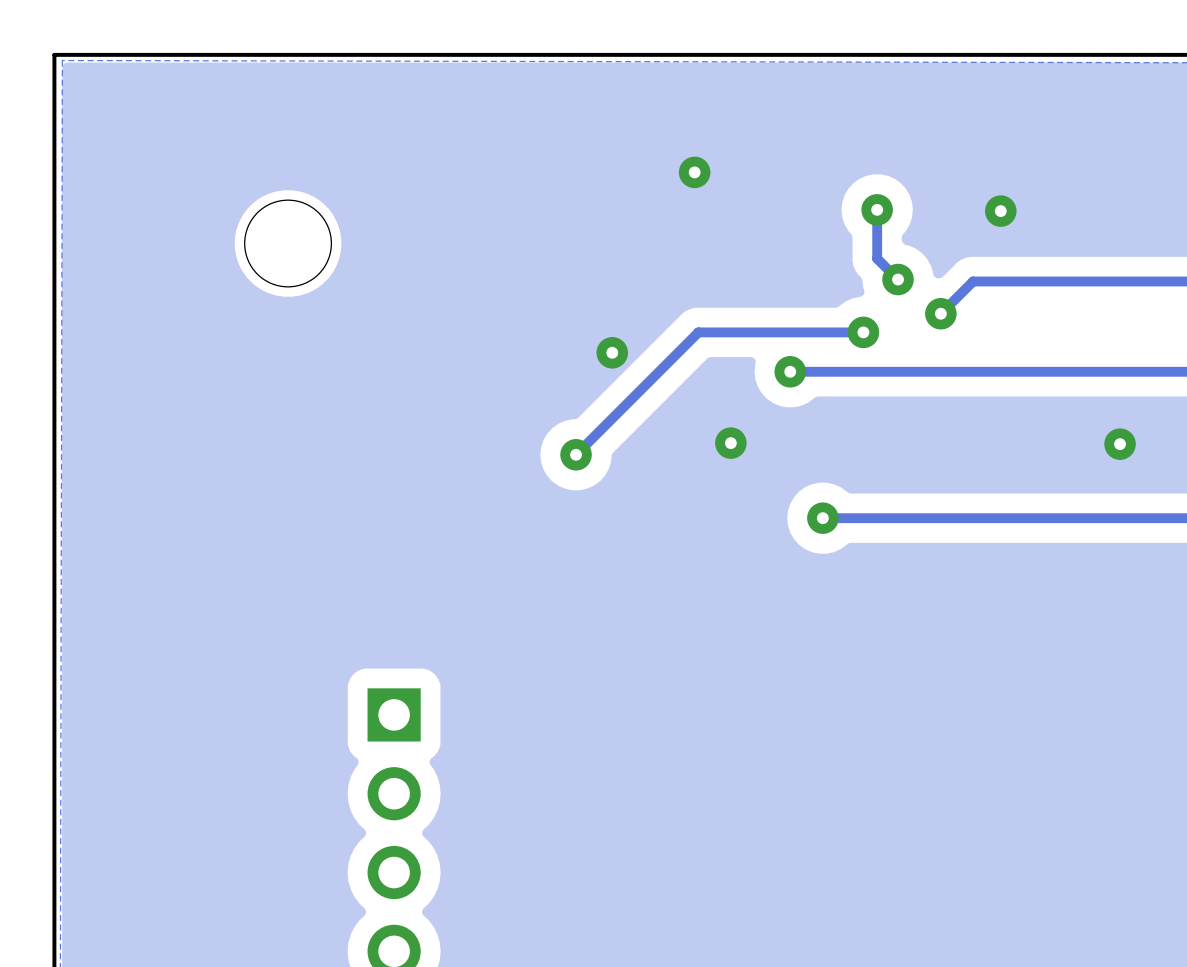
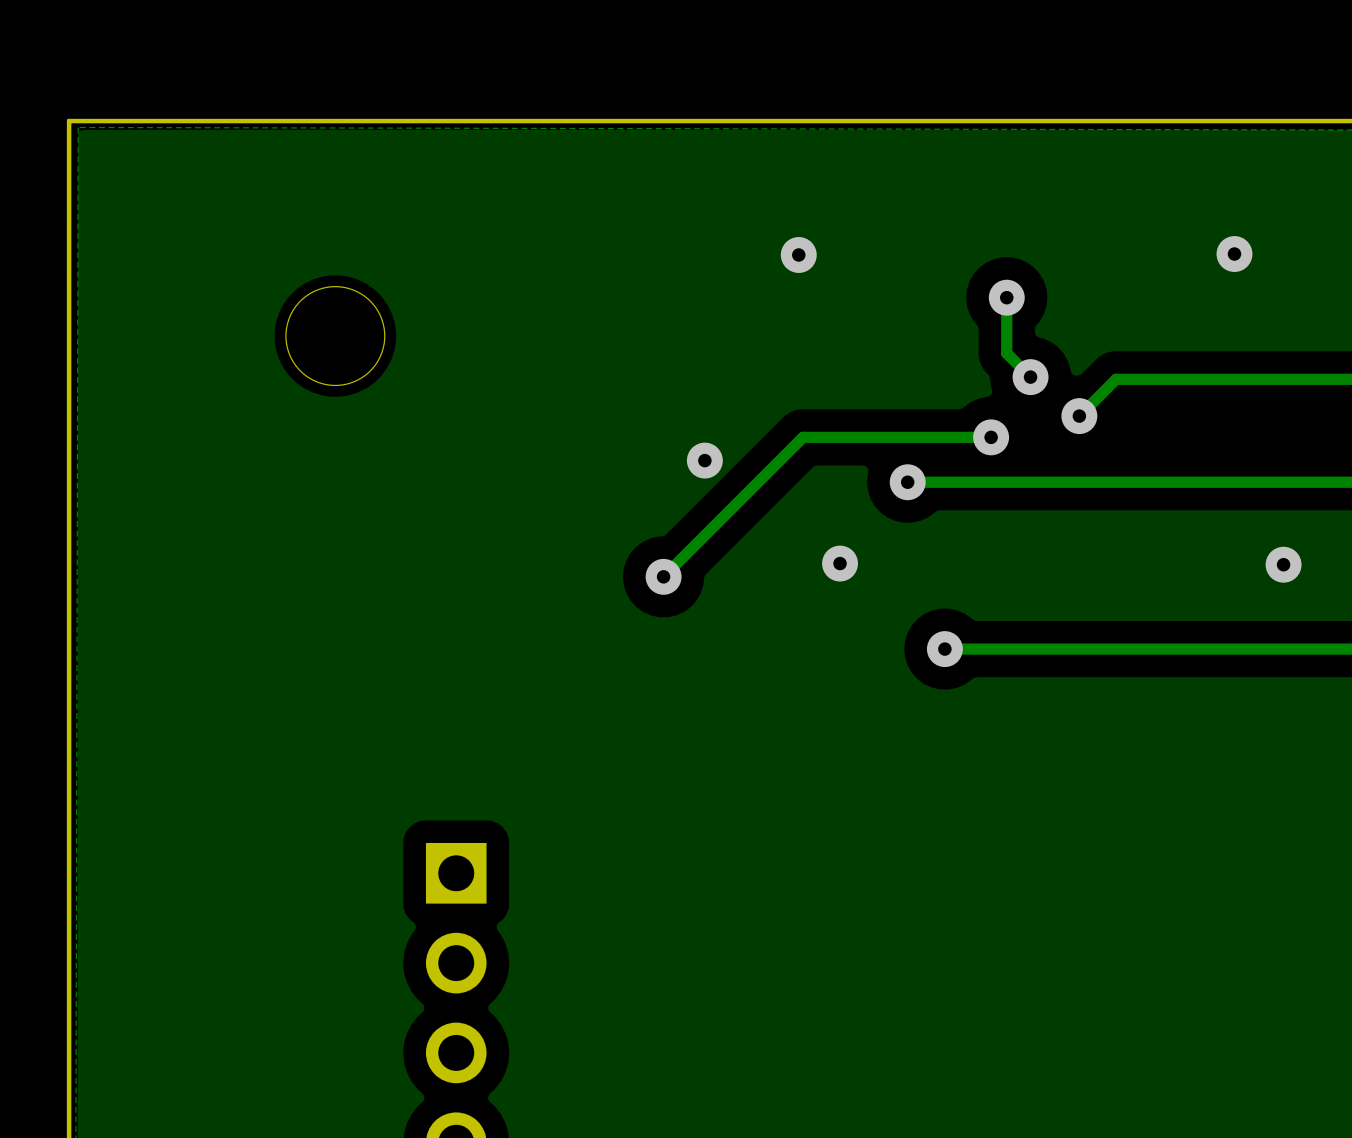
via position: (1000, 211) -> (1234, 254)

